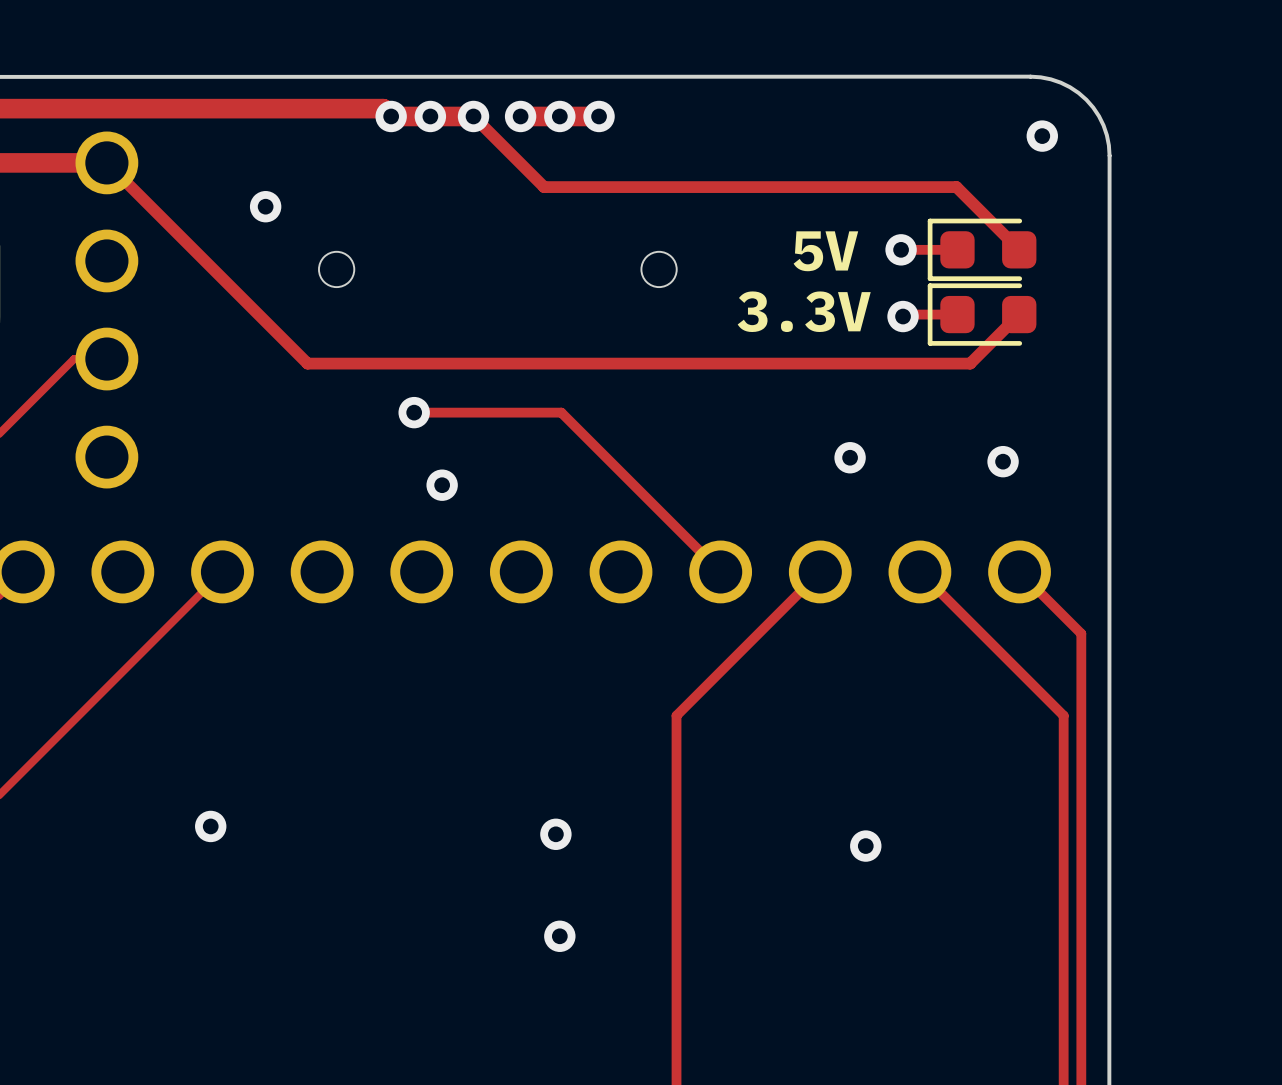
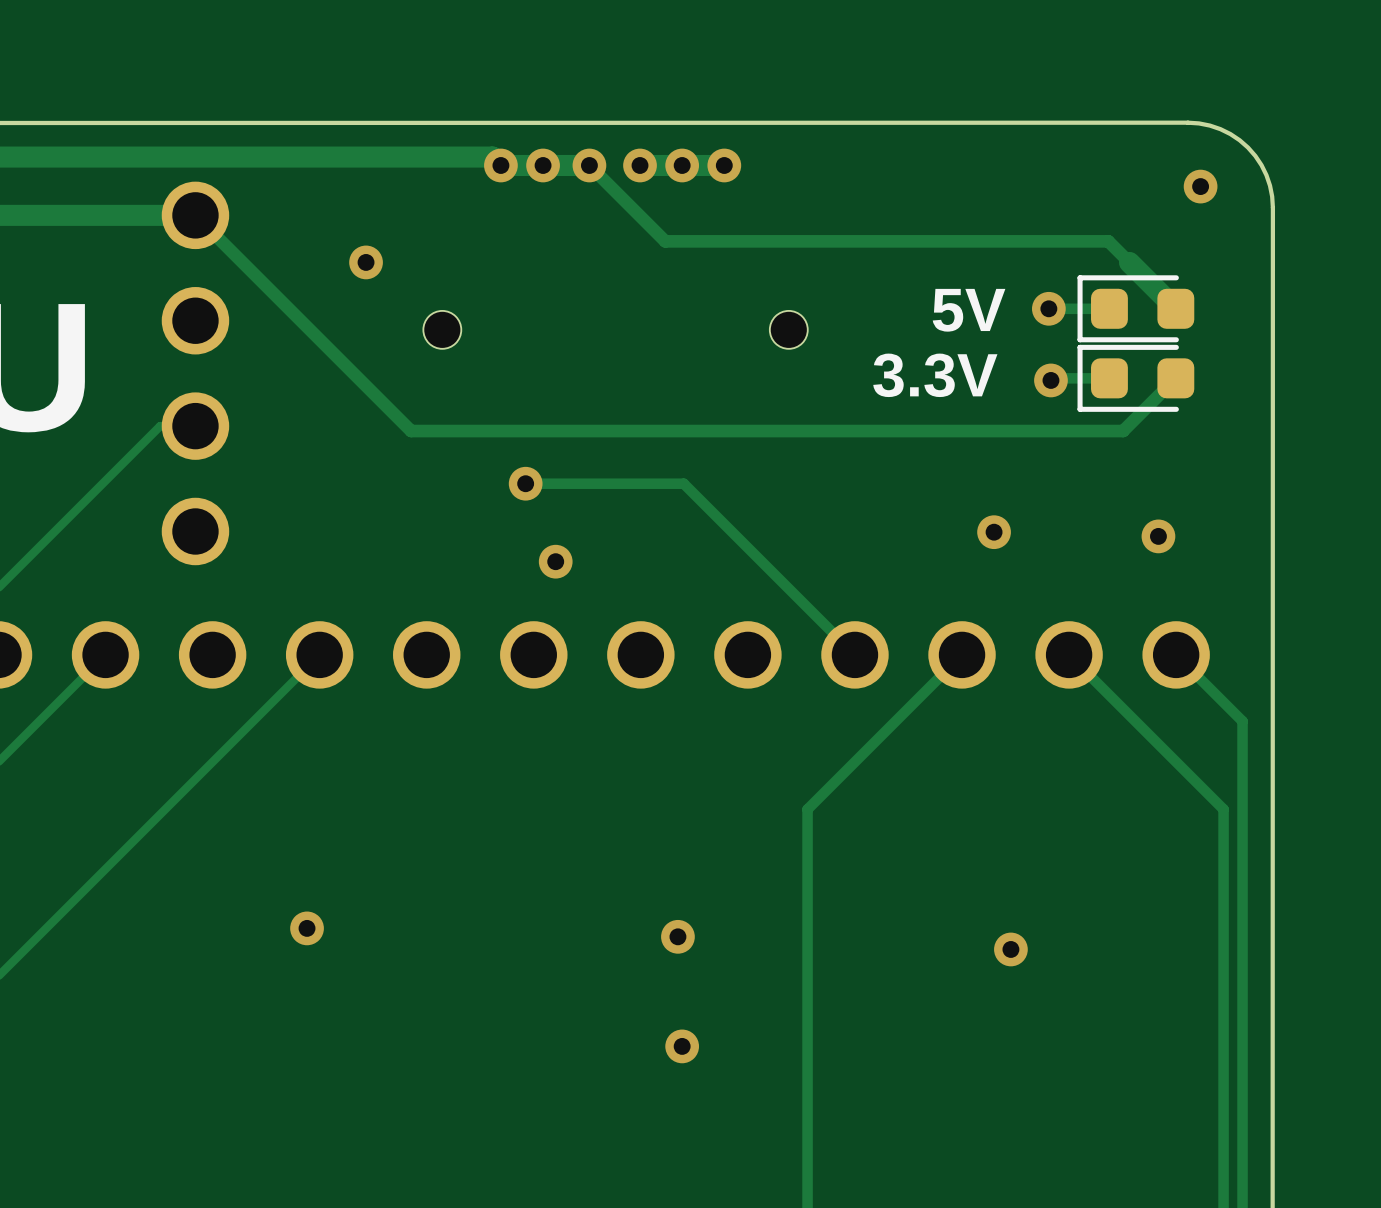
track width: thin (976, 206) (1019, 249) -> thick (1129, 262) (1175, 308)

